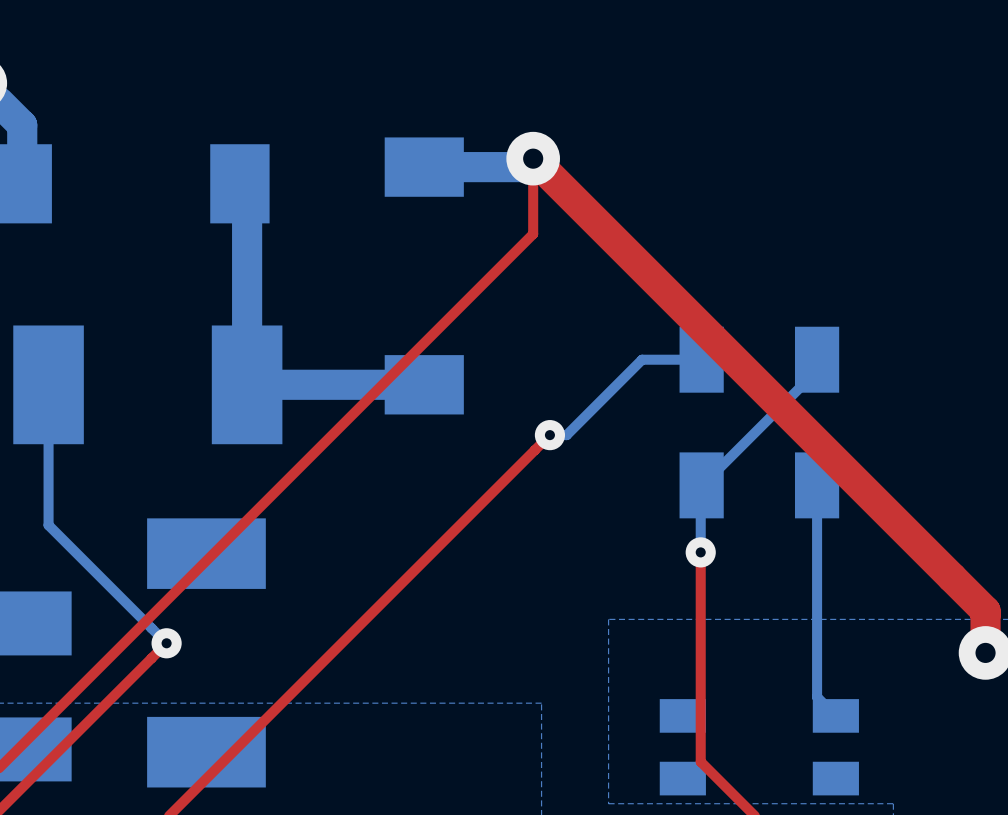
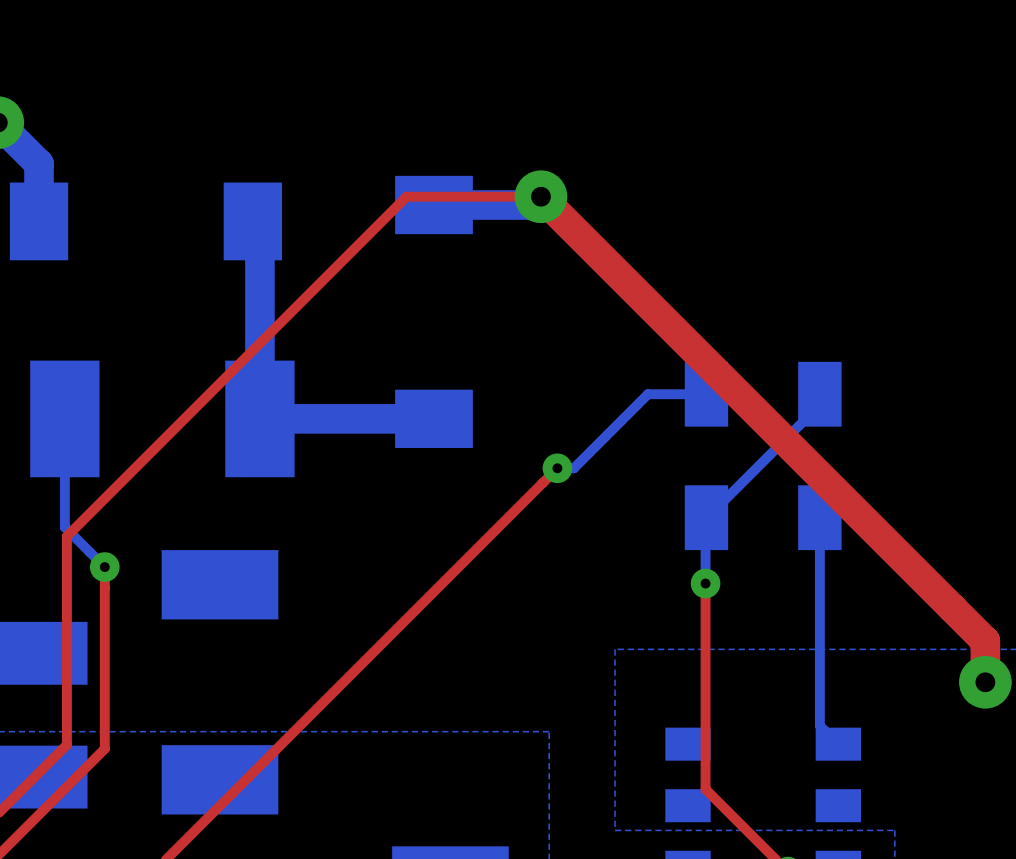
top track: (533, 158) (533, 234) (50, 716) -> (540, 196) (406, 196) (66, 536) (66, 744)
bottom track: (48, 495) (48, 525) (166, 643) -> (64, 527) (104, 567)
via: none -> (104, 567)
top track: (166, 643) (89, 720) -> (104, 567) (104, 748)
via: (166, 643) -> none

